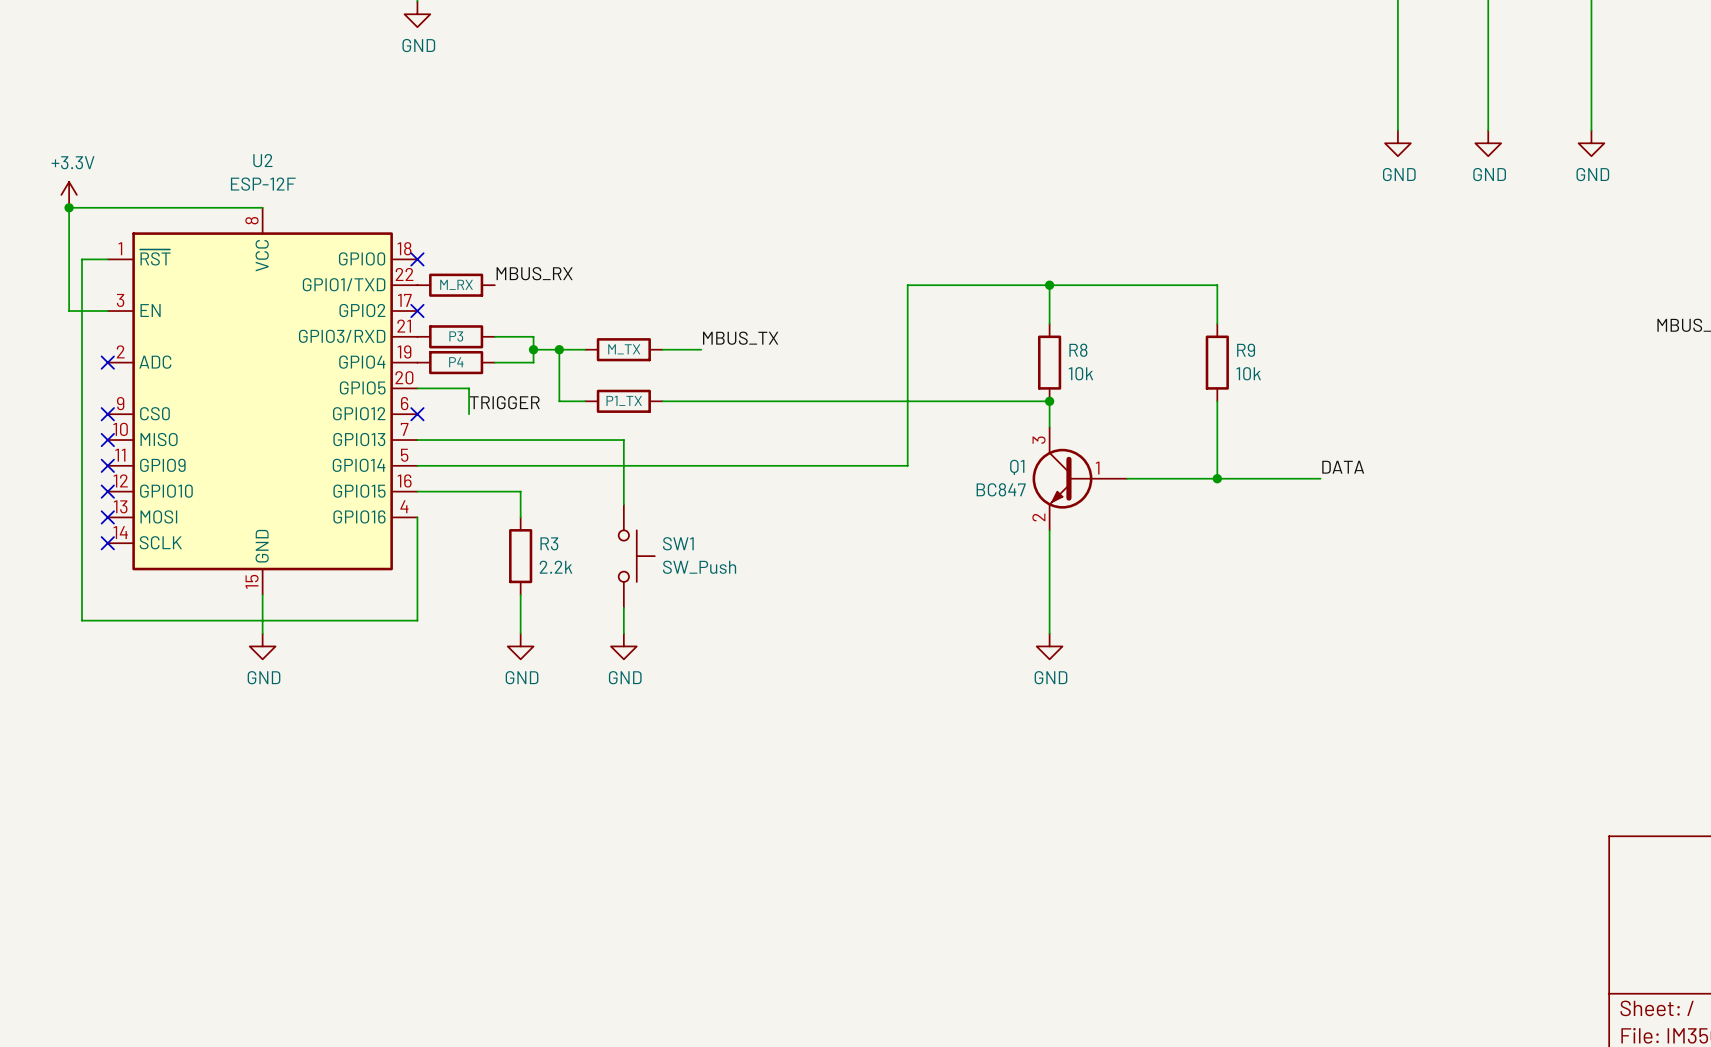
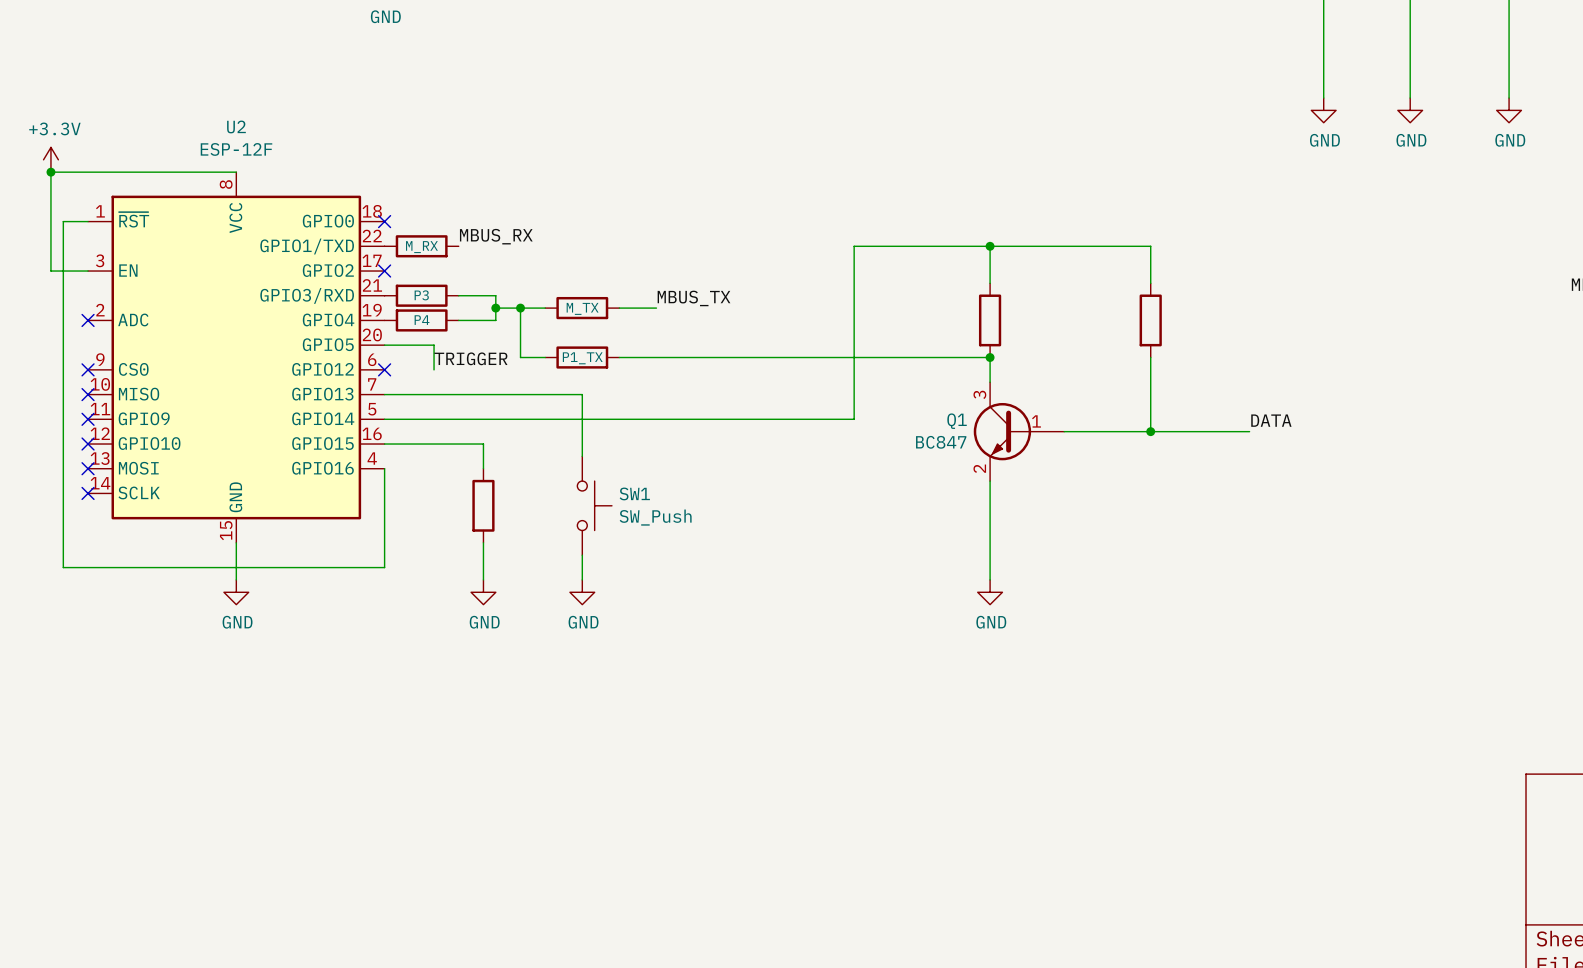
R8 name: R8 (1078, 350) -> none
R9 name: R9 (1246, 350) -> none
R8 value: 10k (1080, 373) -> none
R9 value: 10k (1248, 373) -> none
R3 name: R3 (549, 543) -> none
R3 value: 2.2k (556, 567) -> none

